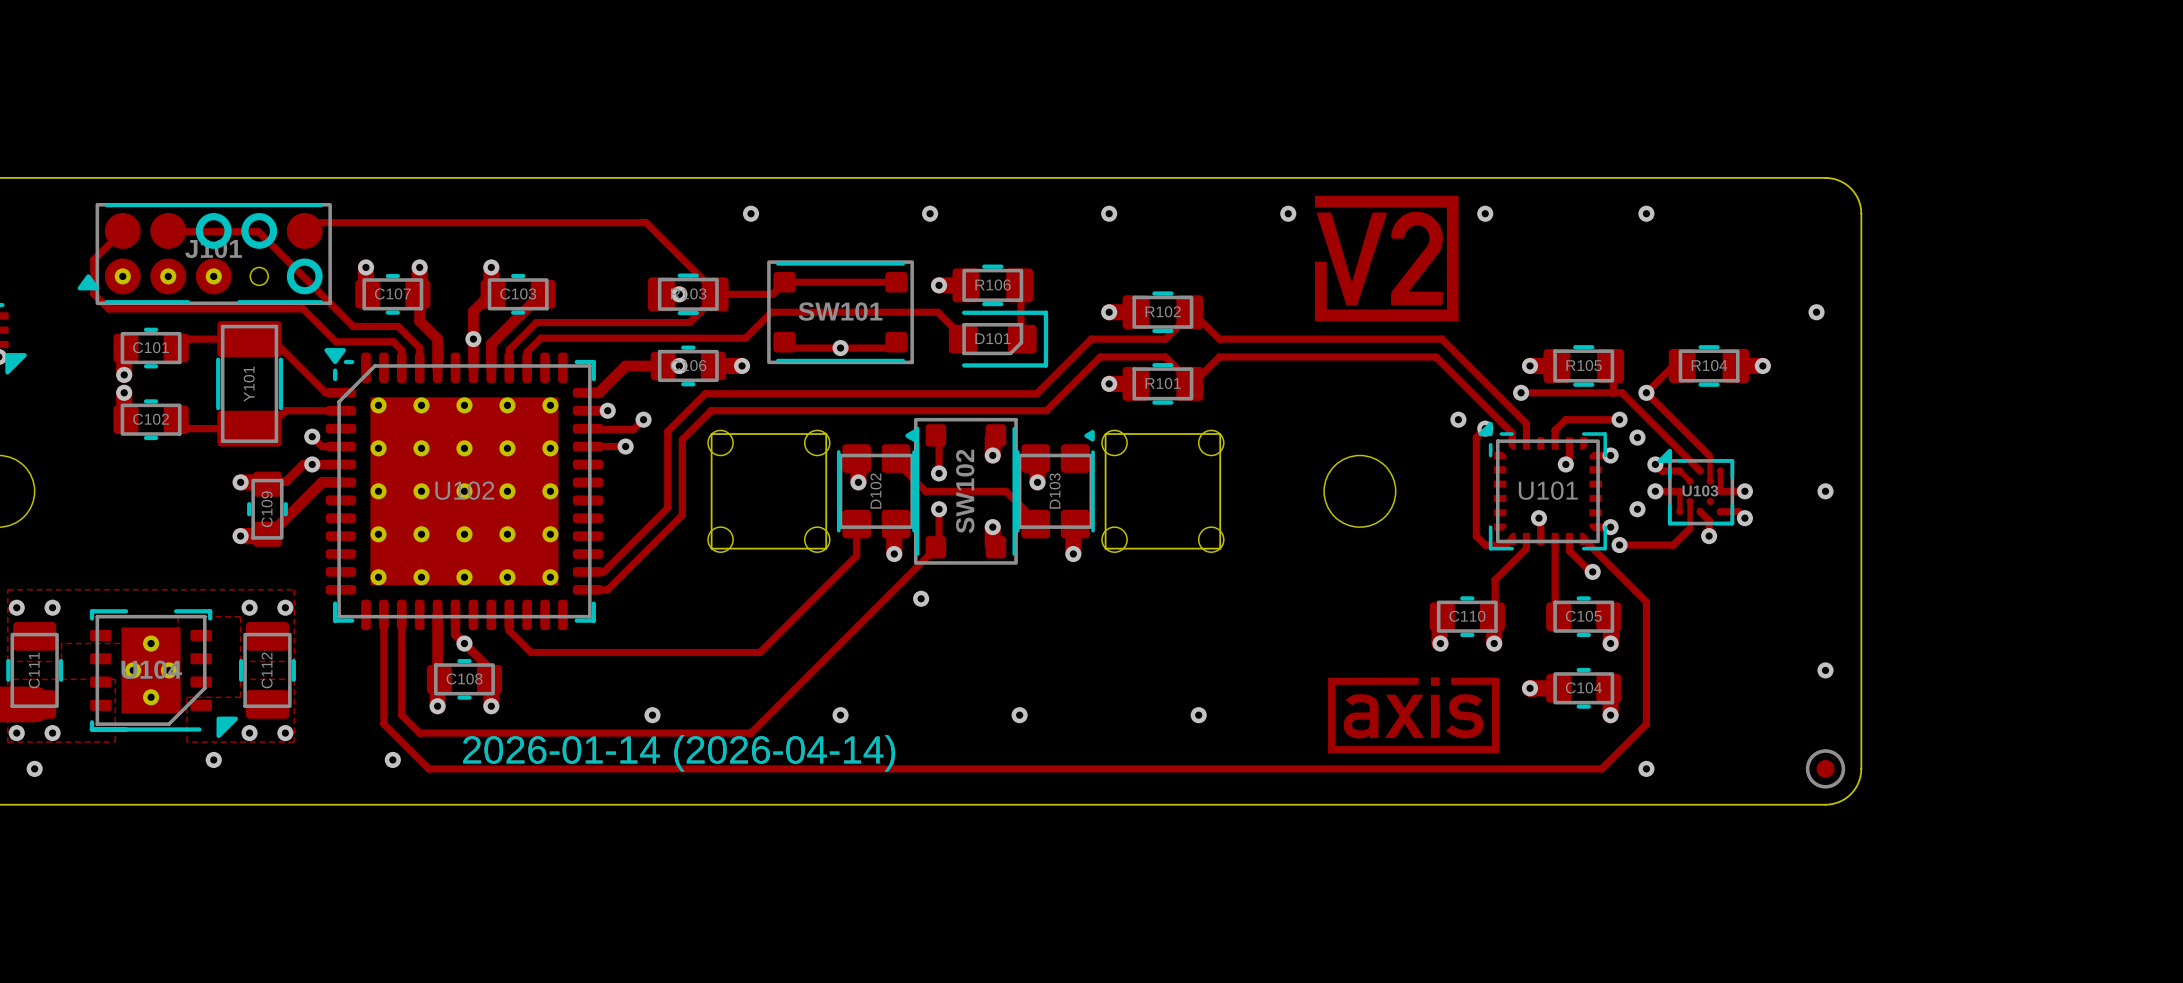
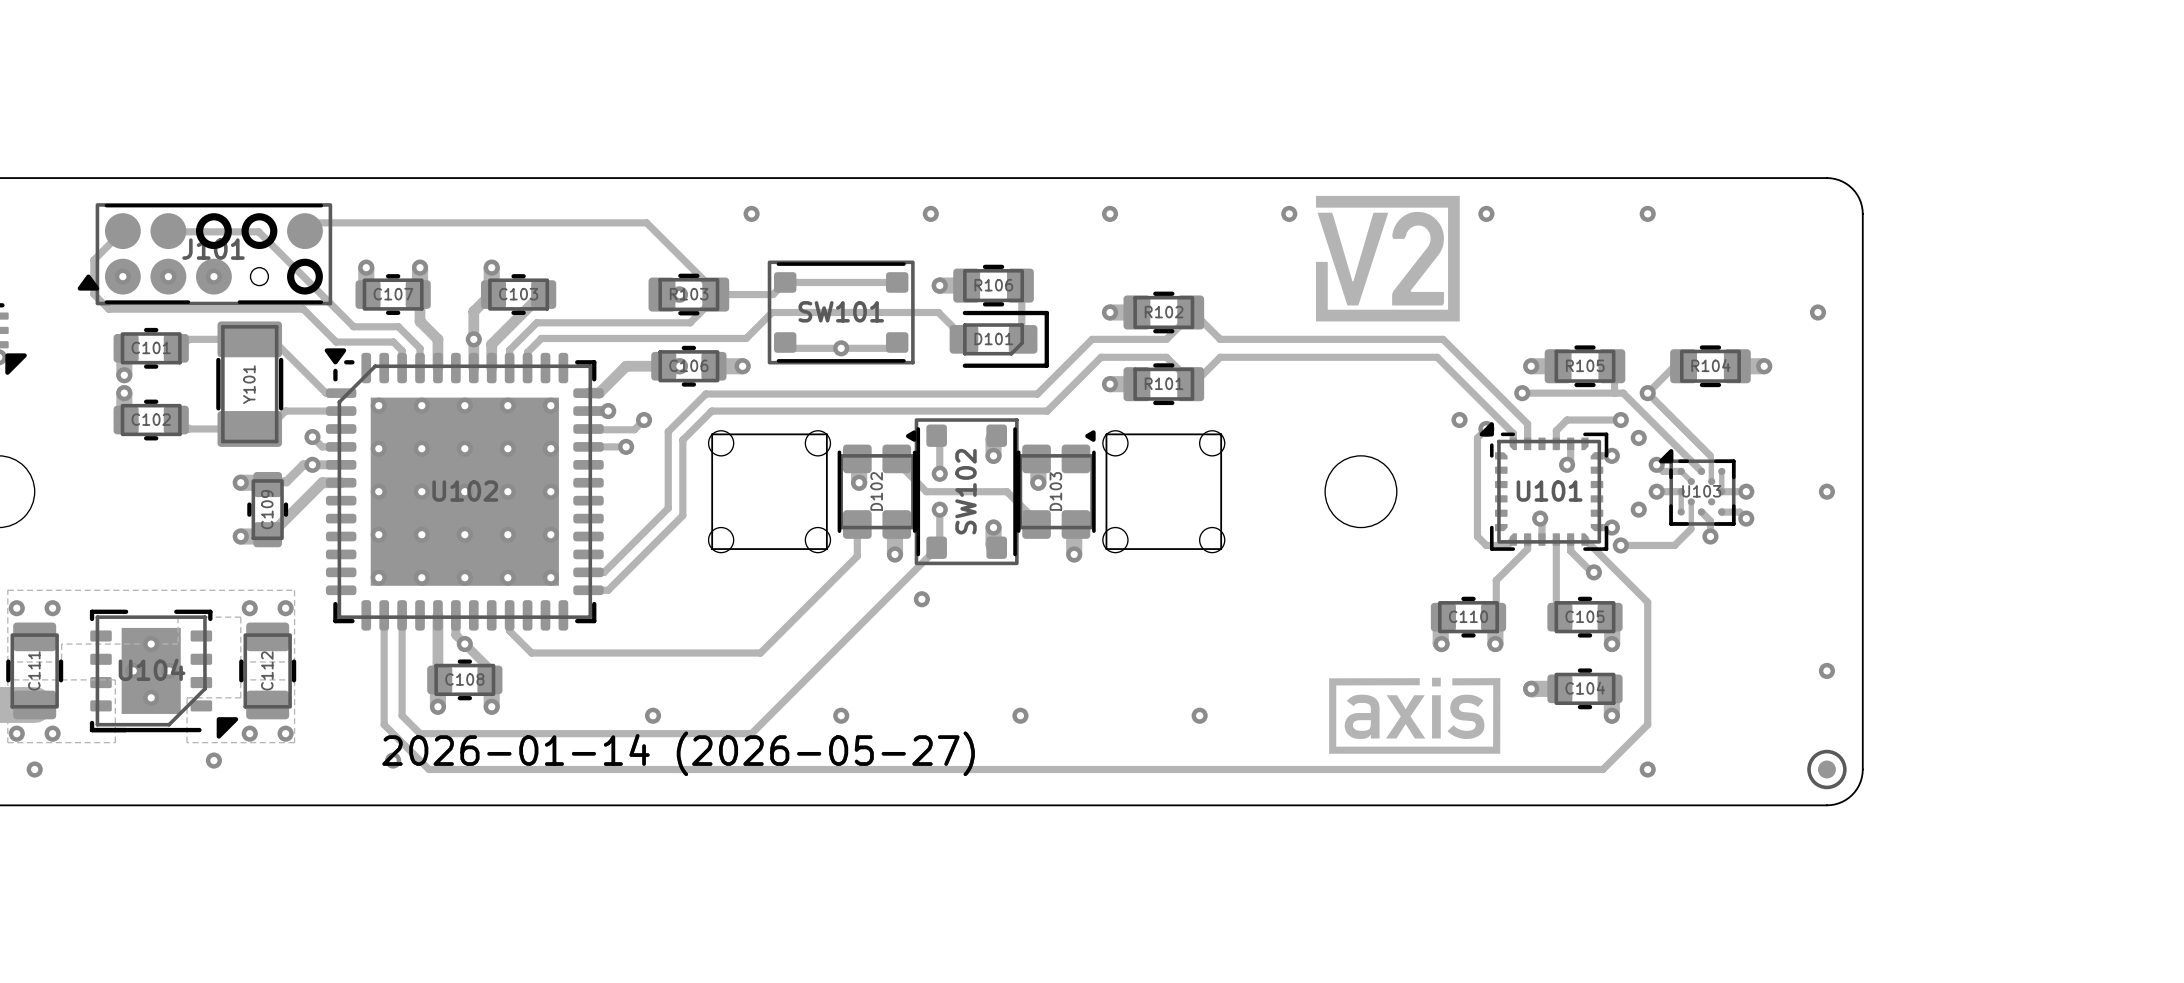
drawing shape: [463, 735, 896, 772] -> [382, 731, 975, 777]

